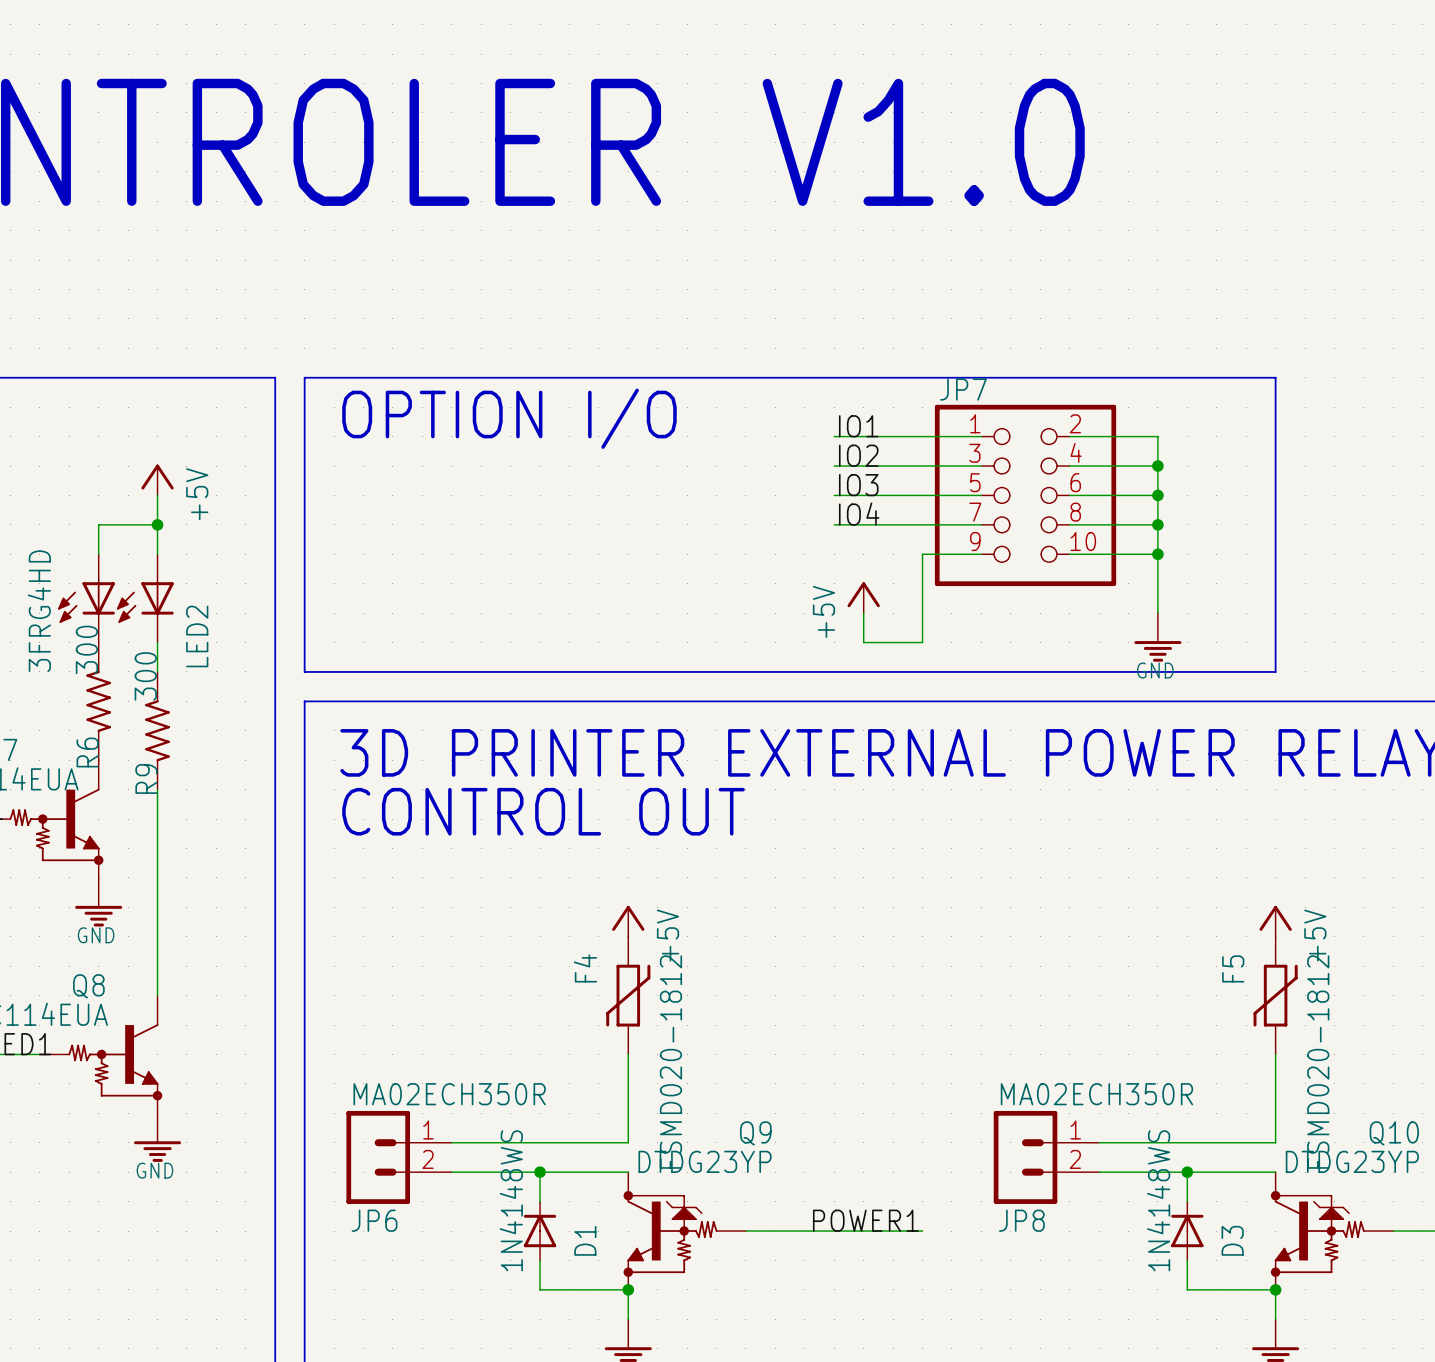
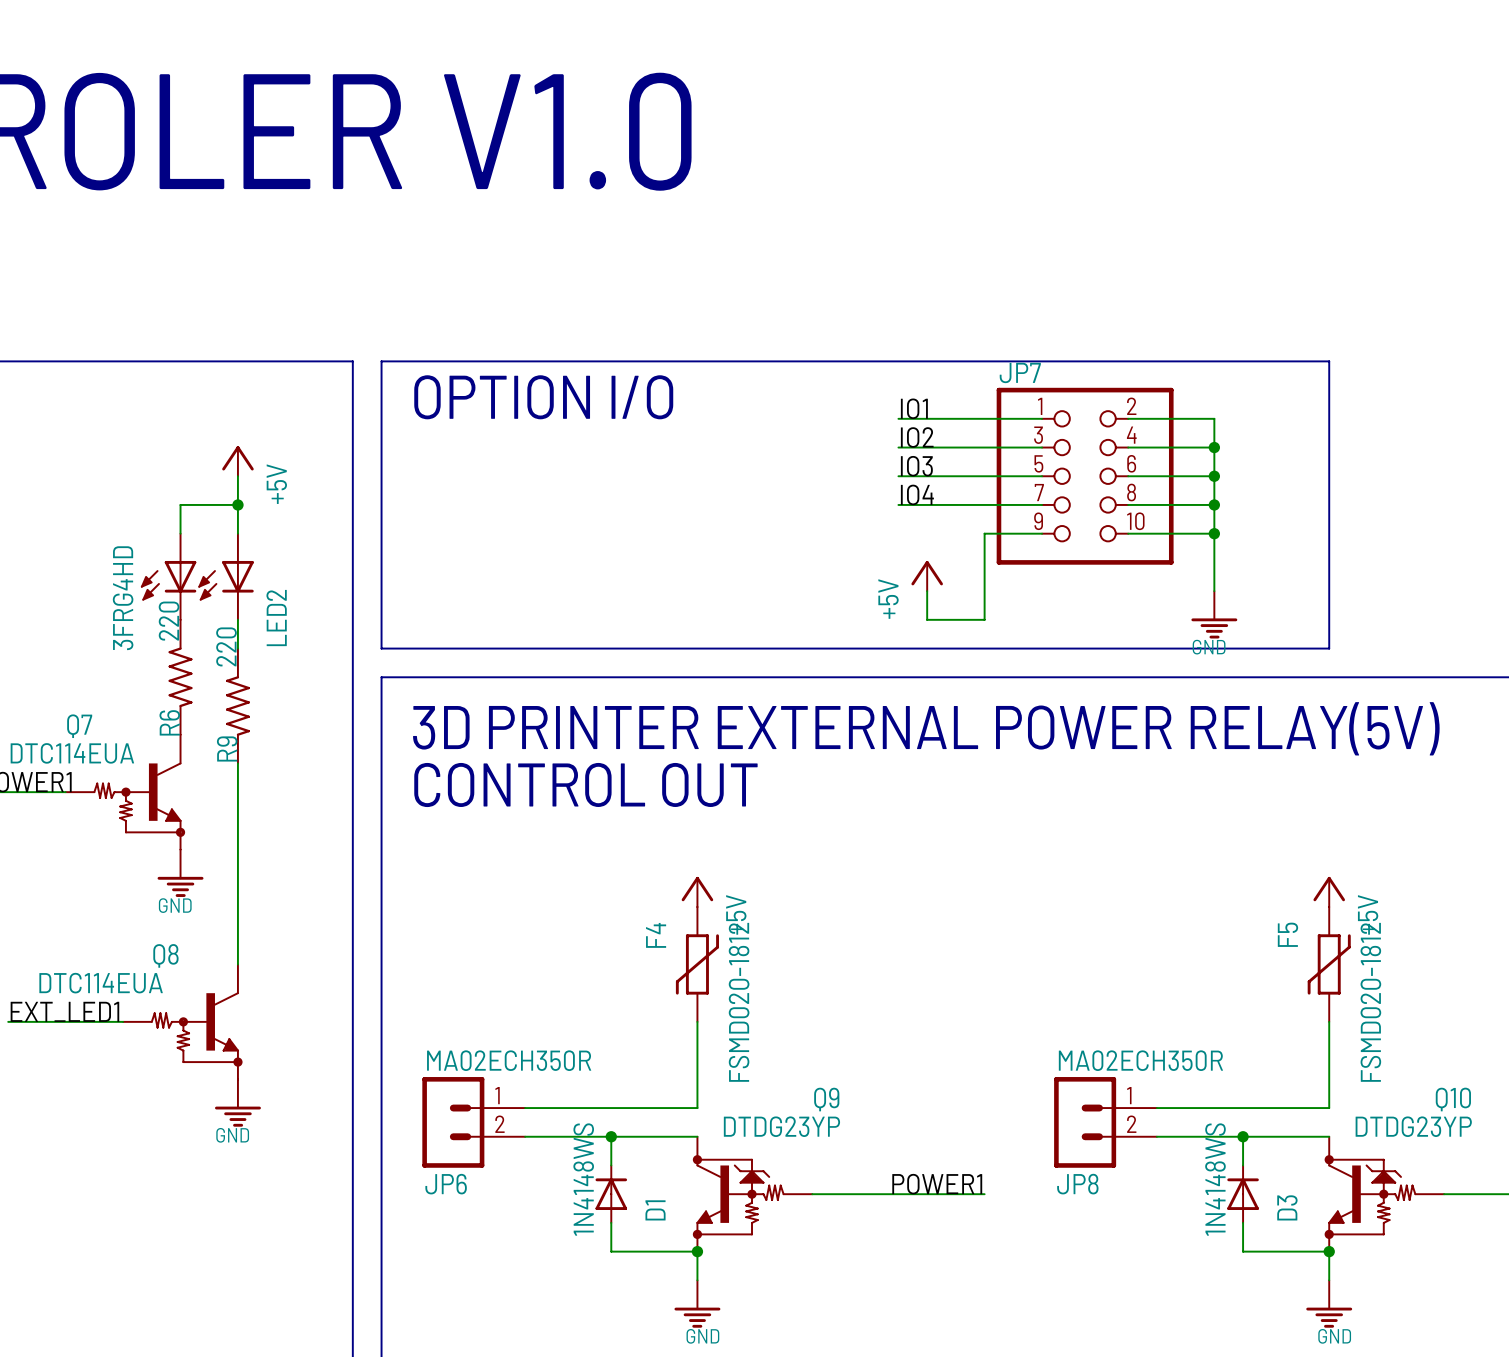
R6 value: 300 (86, 649) -> 220 (169, 621)
R9 value: 300 (145, 676) -> 220 (226, 646)

